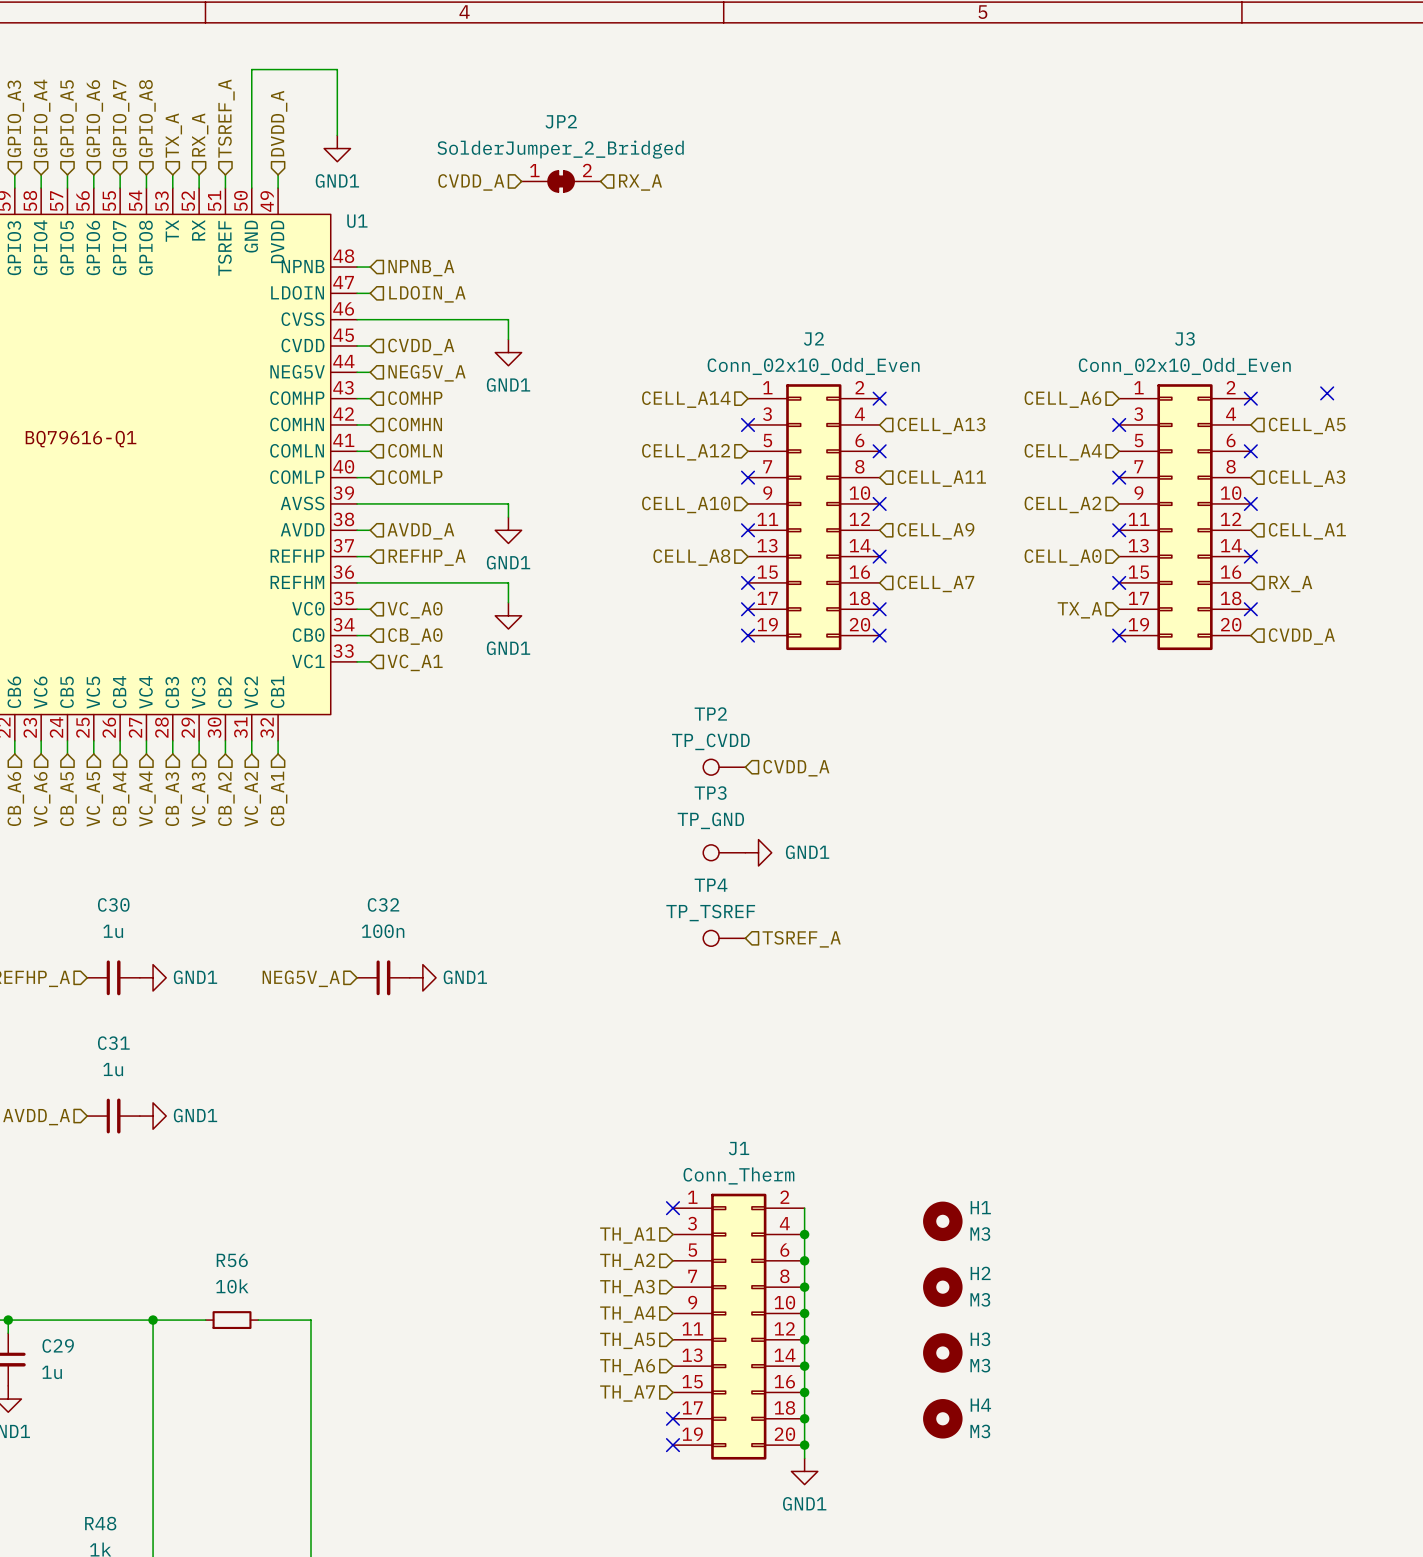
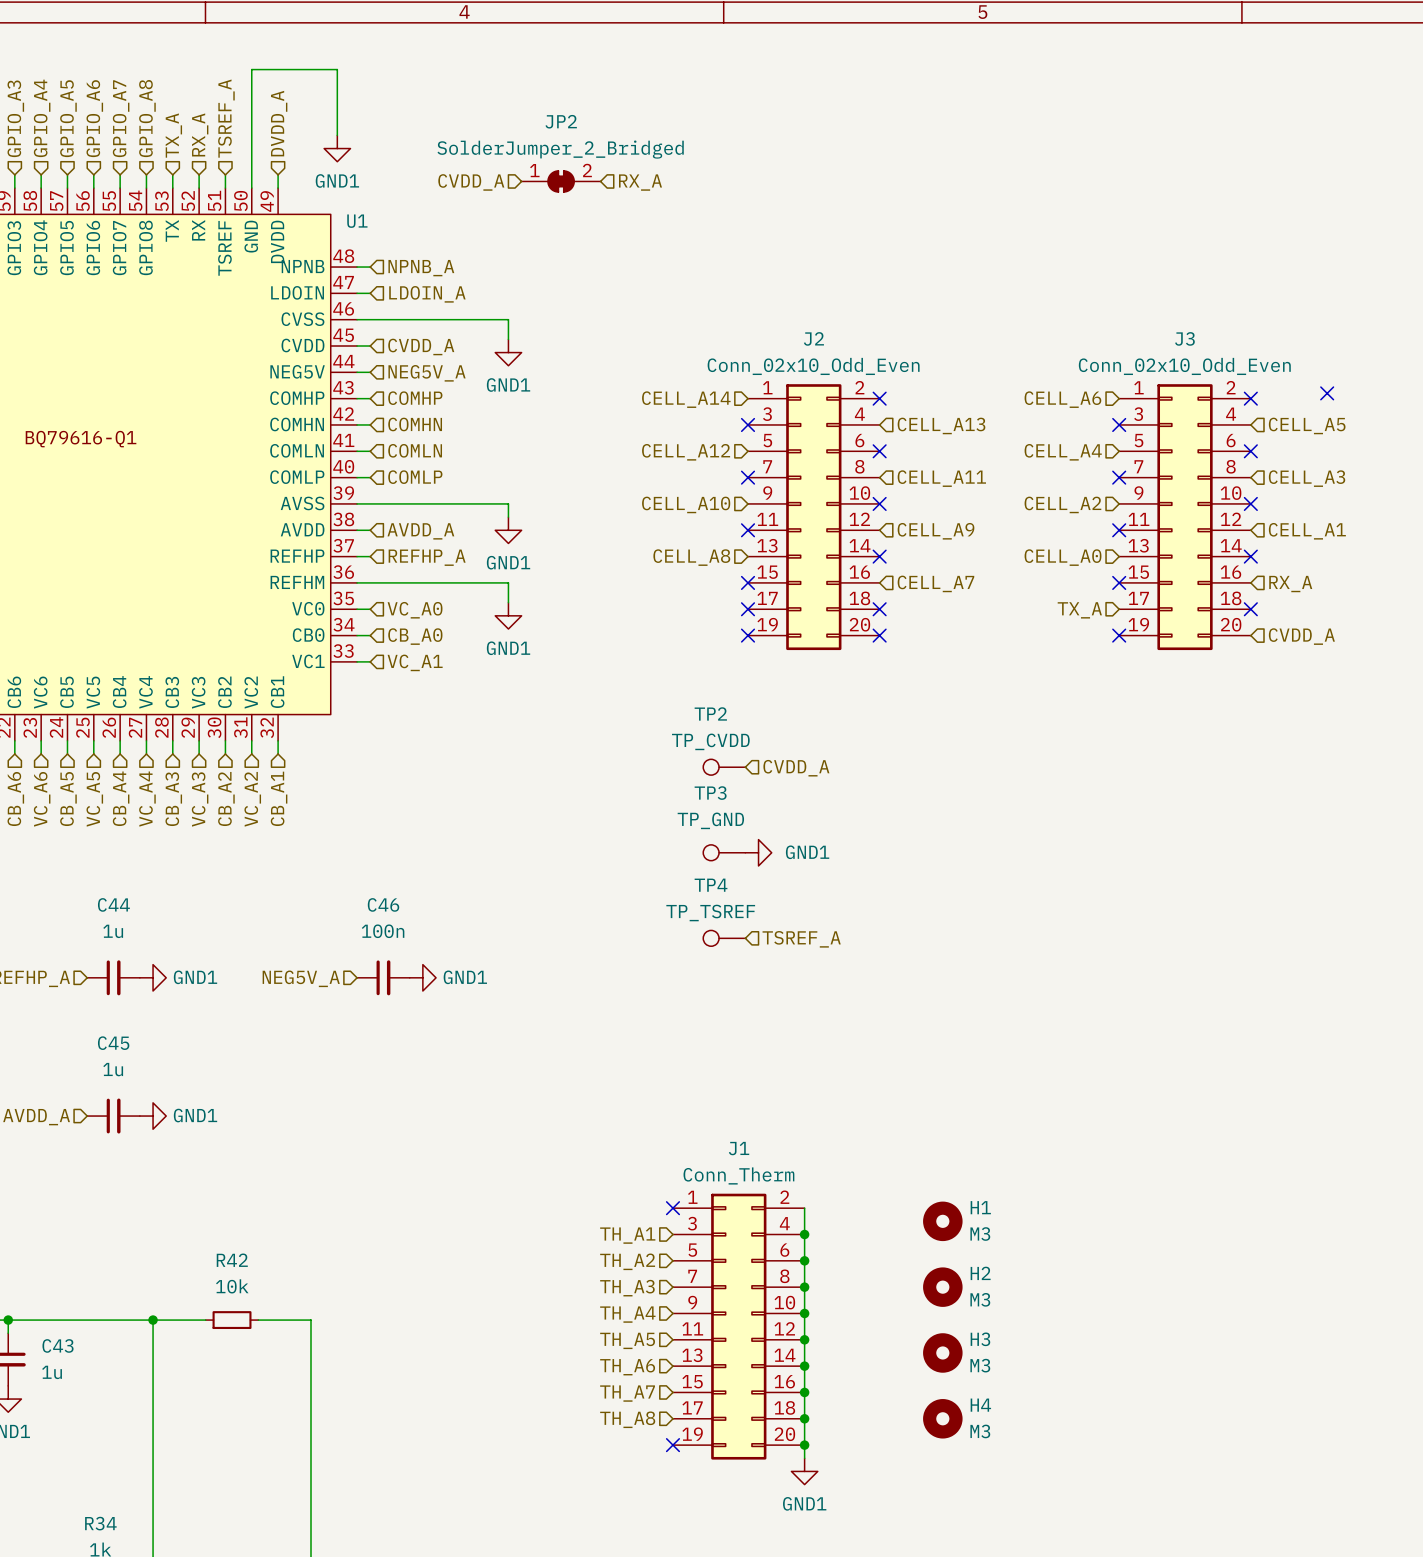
C30 name: C30 (113, 904) -> C44 (113, 904)
C32 name: C32 (383, 904) -> C46 (383, 904)
C31 name: C31 (113, 1043) -> C45 (113, 1043)
R56 name: R56 (232, 1260) -> R42 (232, 1260)
C29 name: C29 (58, 1345) -> C43 (58, 1345)
no-connect mark: (672, 1418) -> none
hierarchical label: none -> TH_A8 (627, 1419)
R48 name: R48 (100, 1523) -> R34 (100, 1523)

